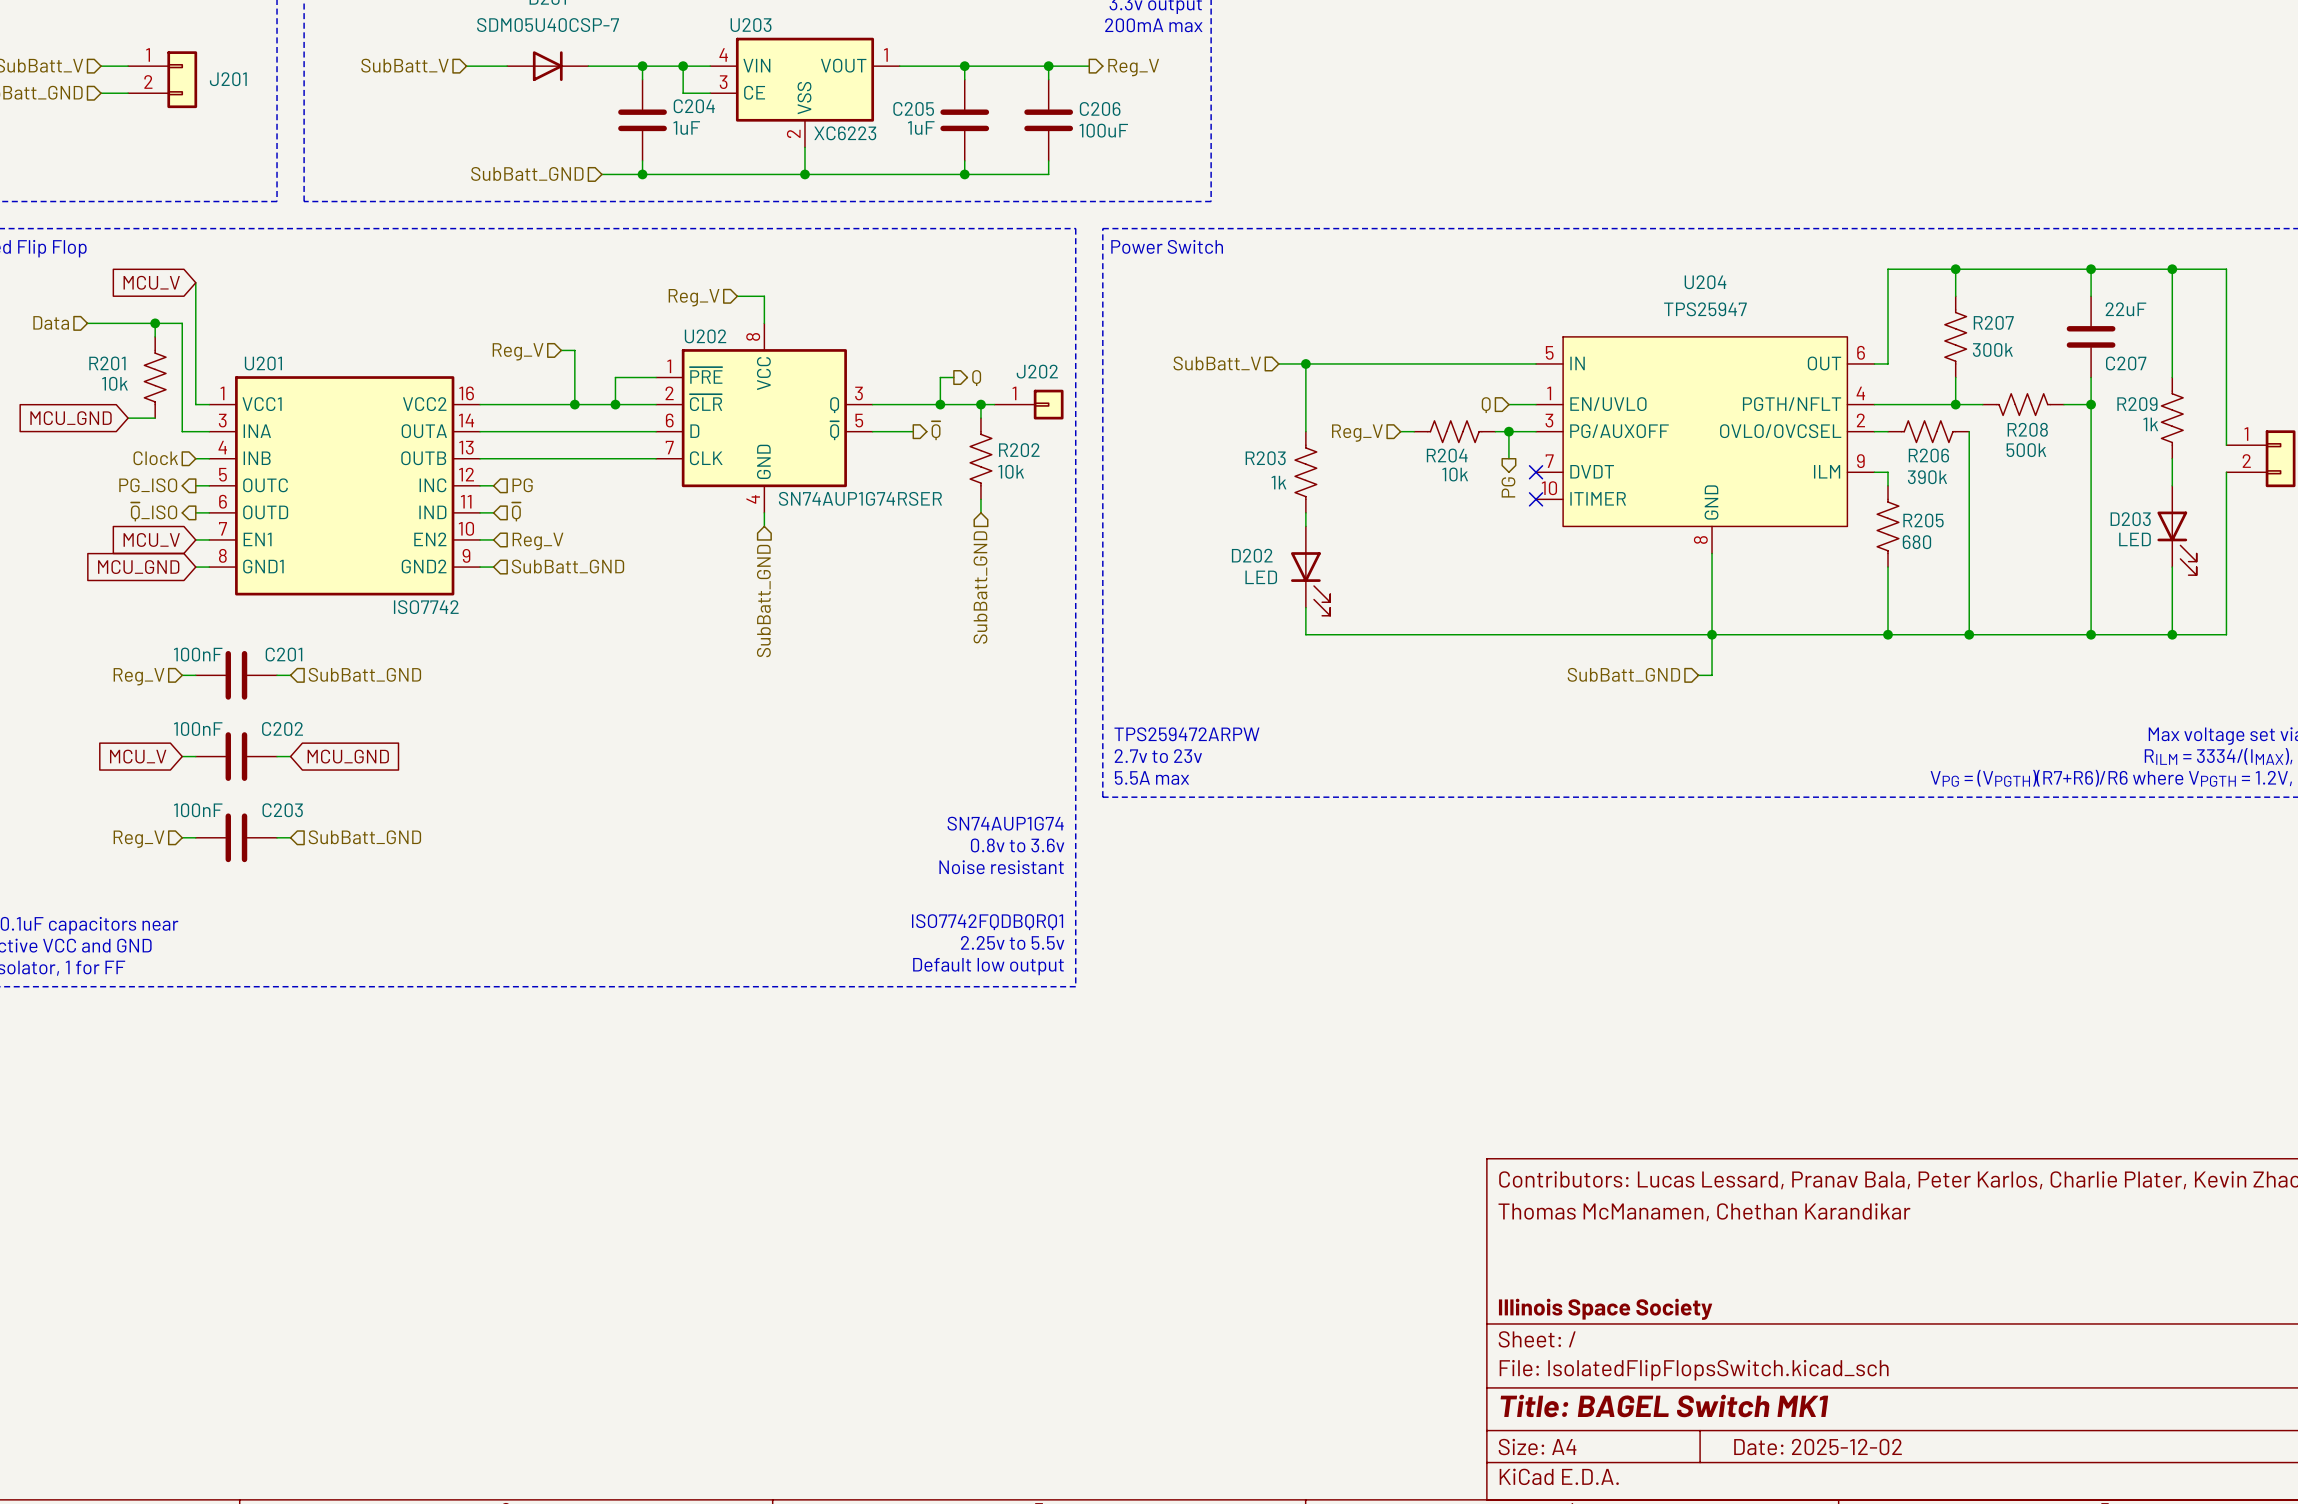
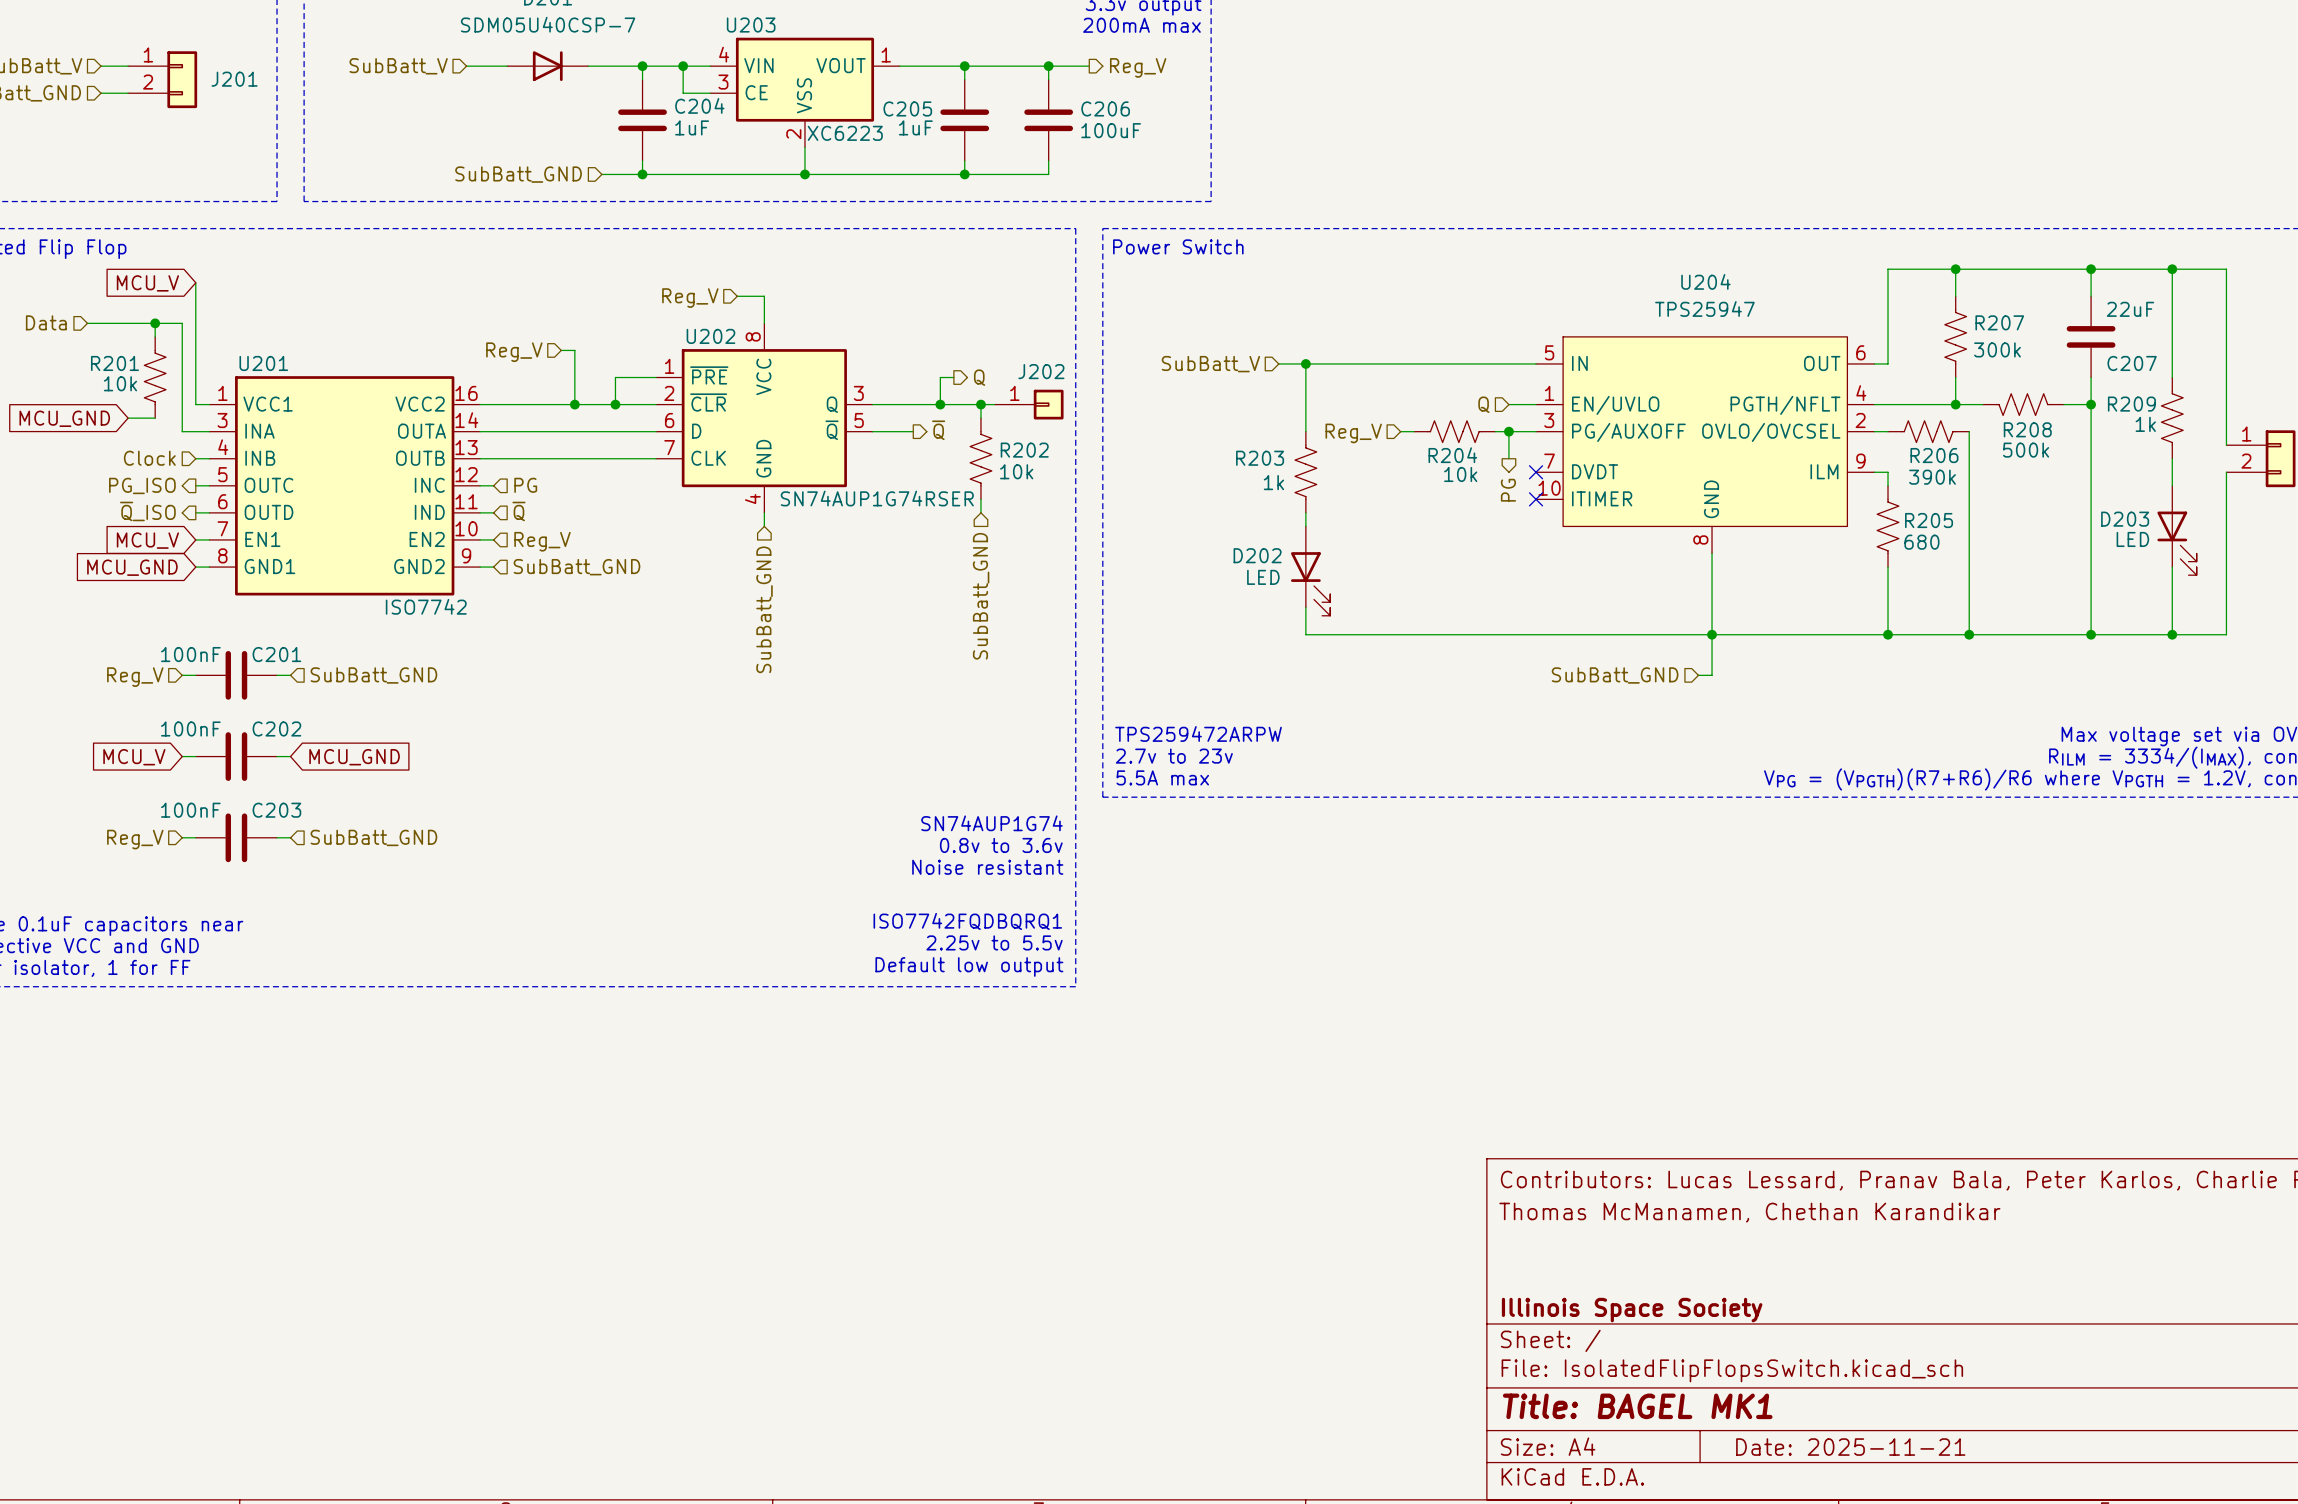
title block: Title: BAGEL Switch MK1 (1664, 1406) -> Title: BAGEL MK1 (1637, 1406)
title block: Date: 2025-12-02 (1818, 1447) -> Date: 2025-11-21 (1850, 1447)

